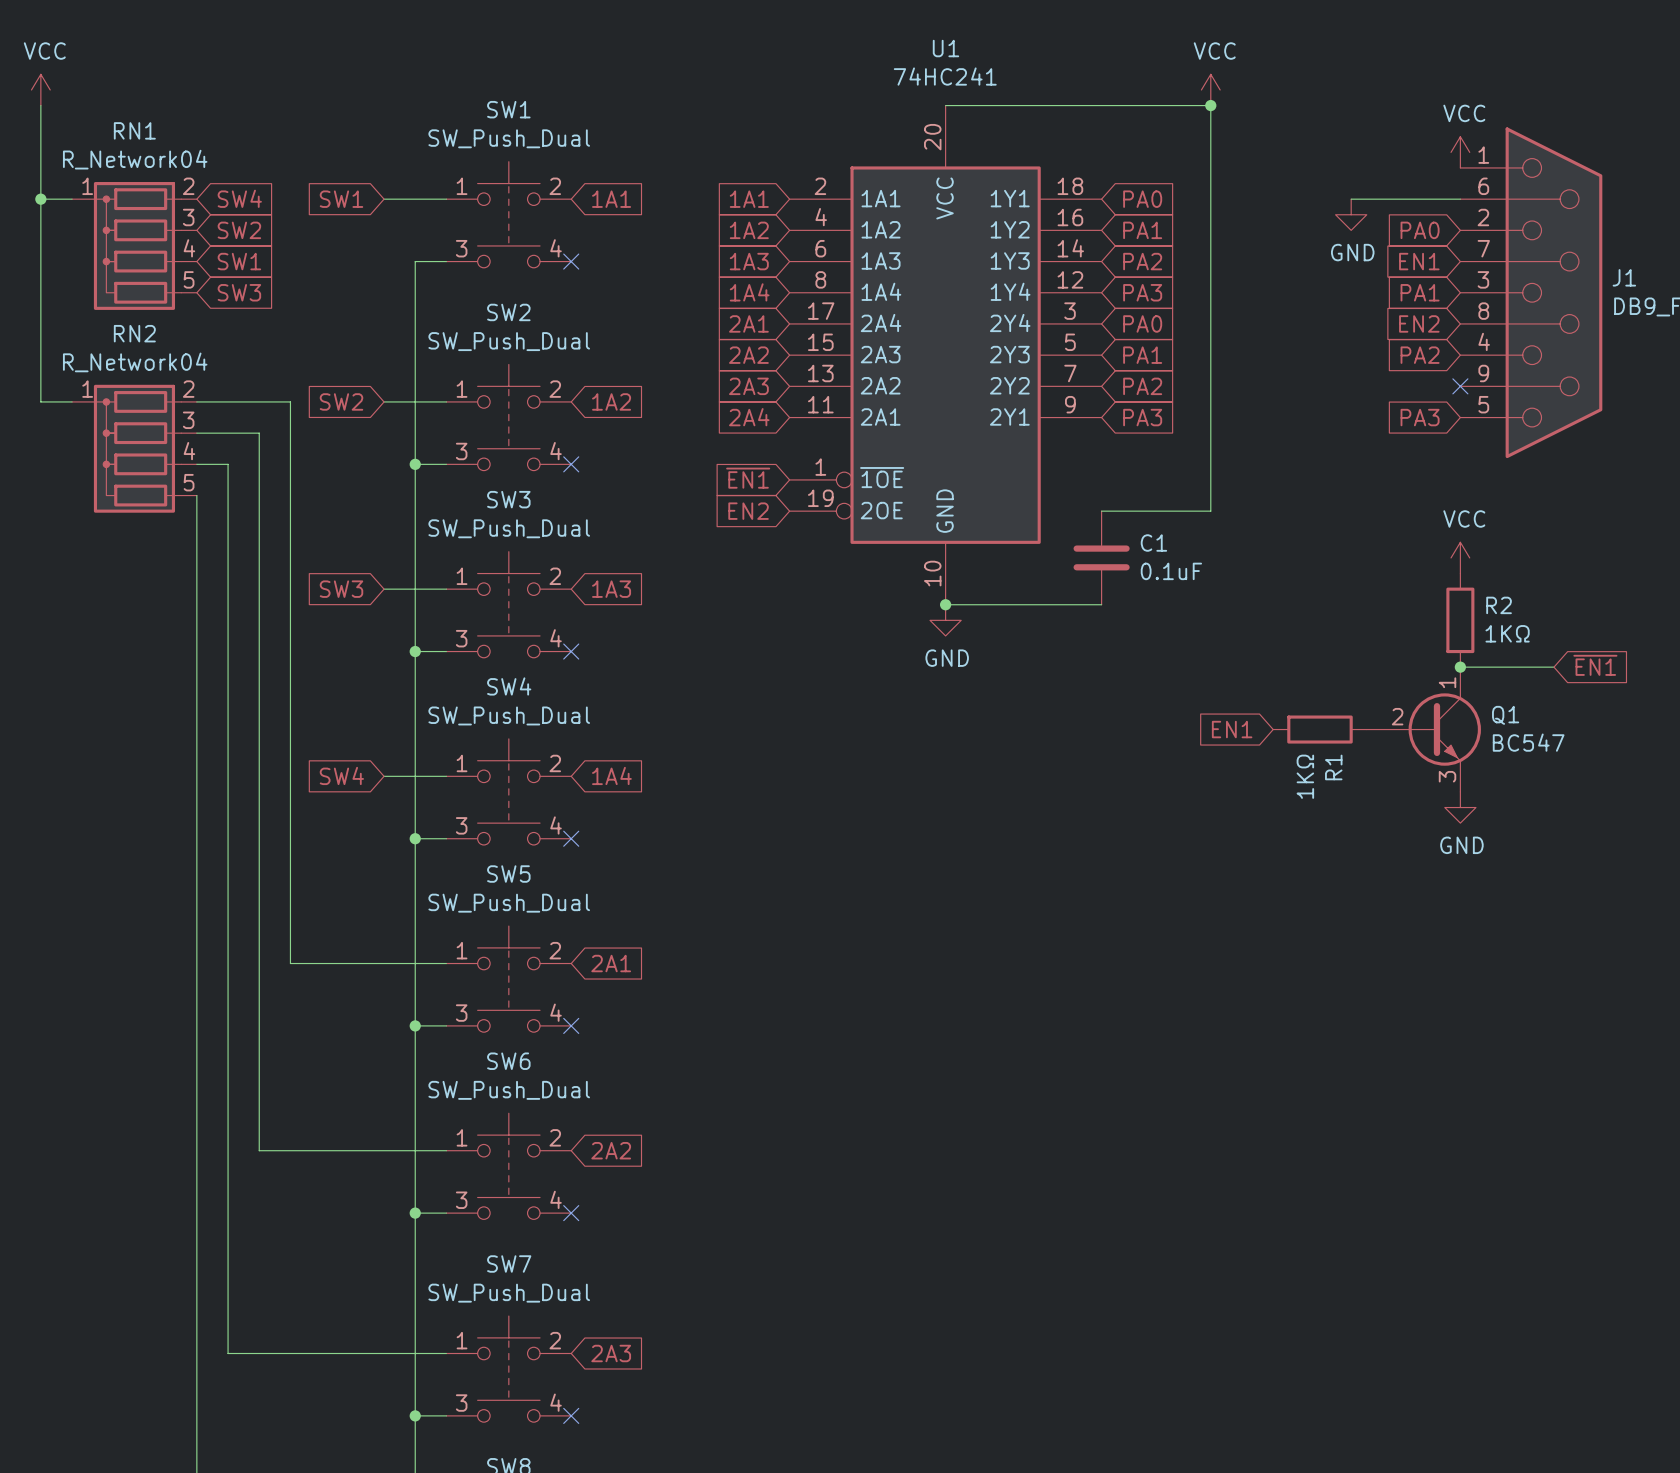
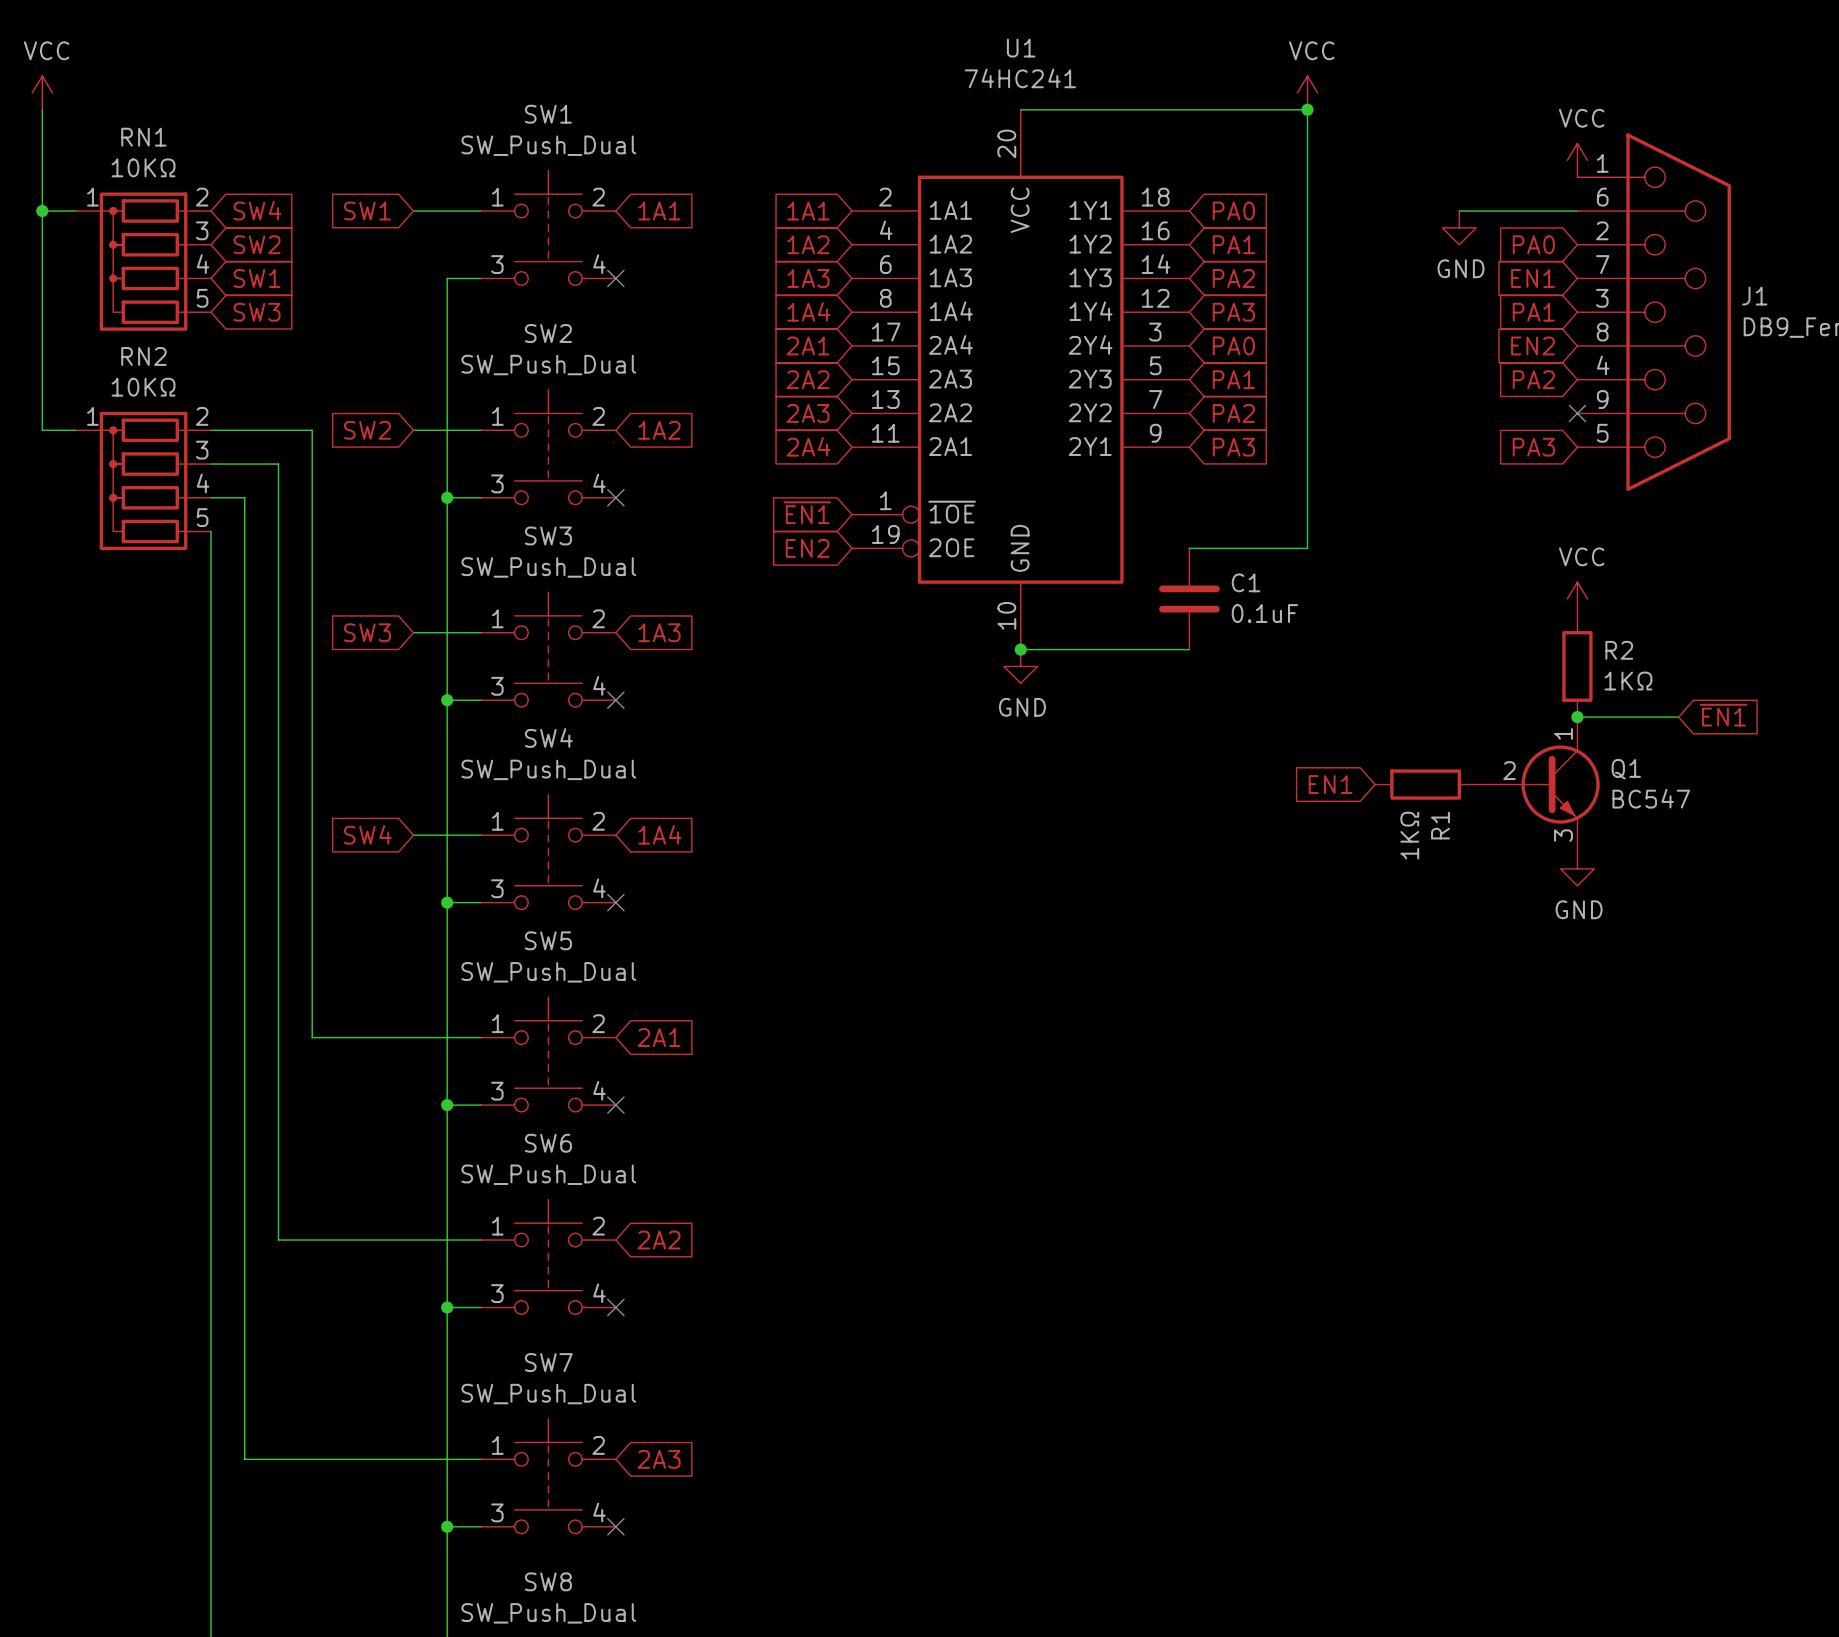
RN1 value: R_Network04 (135, 159) -> 10KΩ (143, 167)
RN2 value: R_Network04 (135, 362) -> 10KΩ (143, 387)

